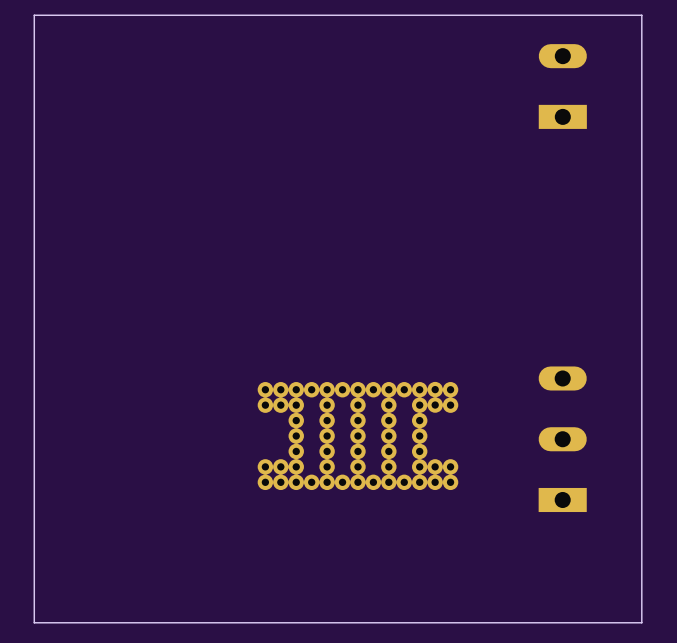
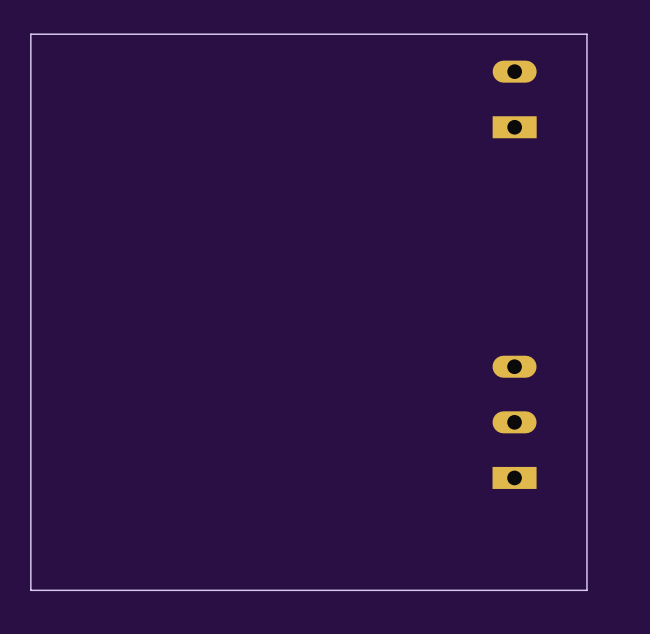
part: (357, 435) -> none

